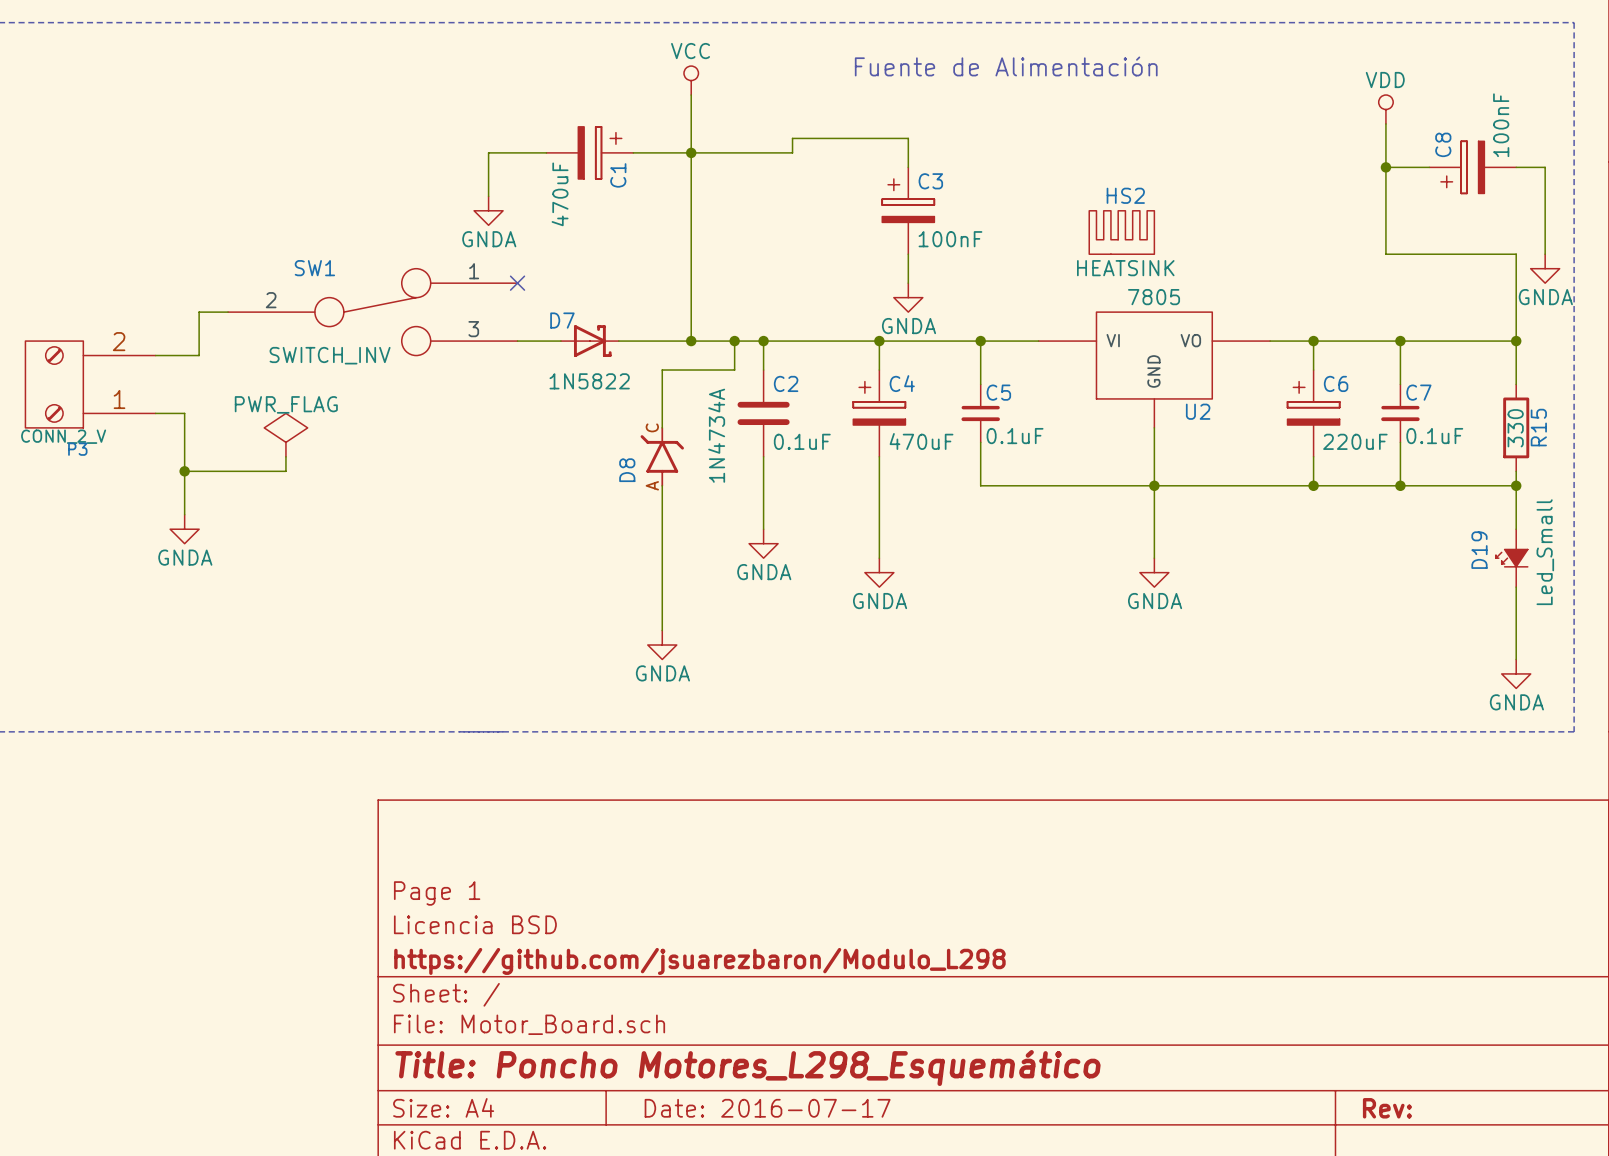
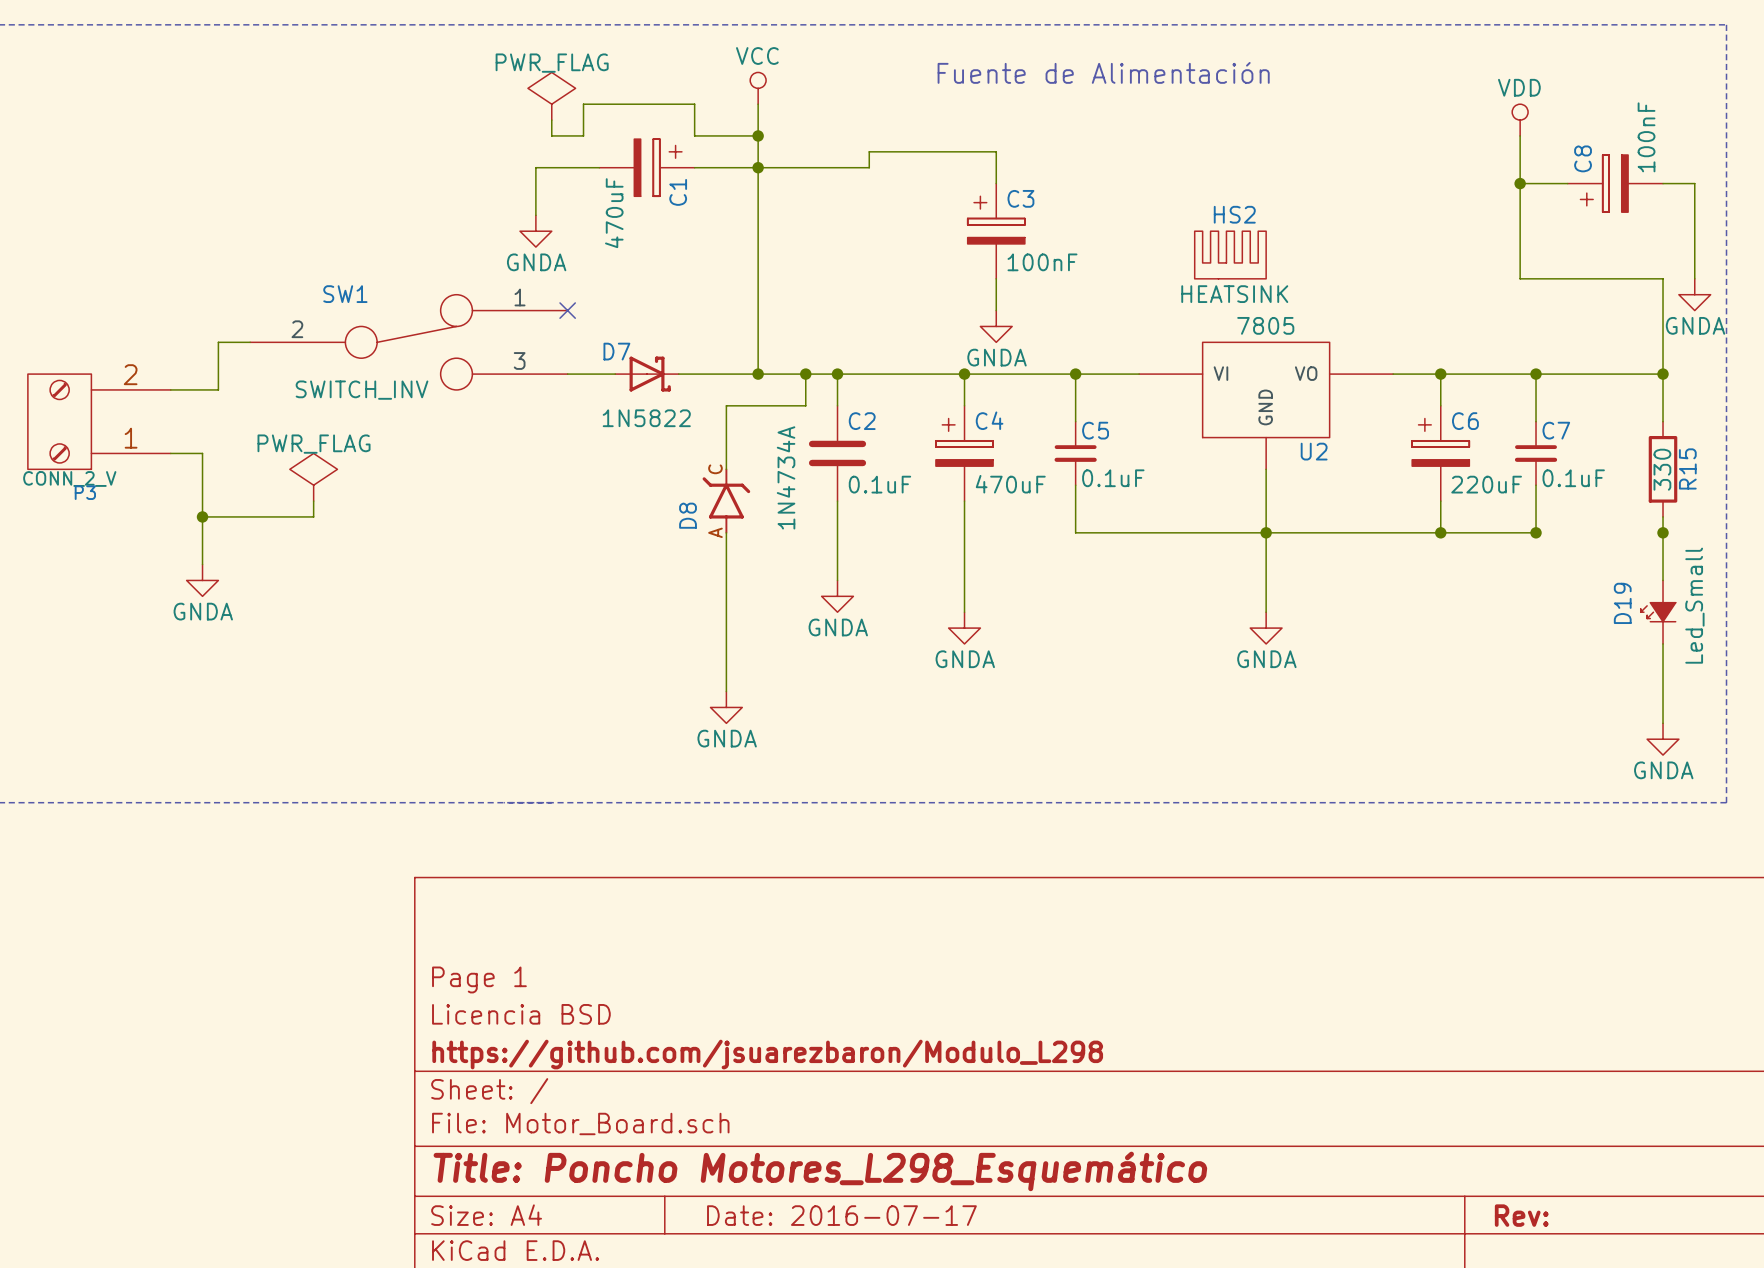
power symbol: none -> PWR_FLAG (551, 96)
wire: none -> (551, 120) (551, 135) (583, 135) (583, 104) (694, 104) (694, 135) (758, 135)
junction: none -> (758, 135)
wire: (1400, 485) (1516, 485) -> none

